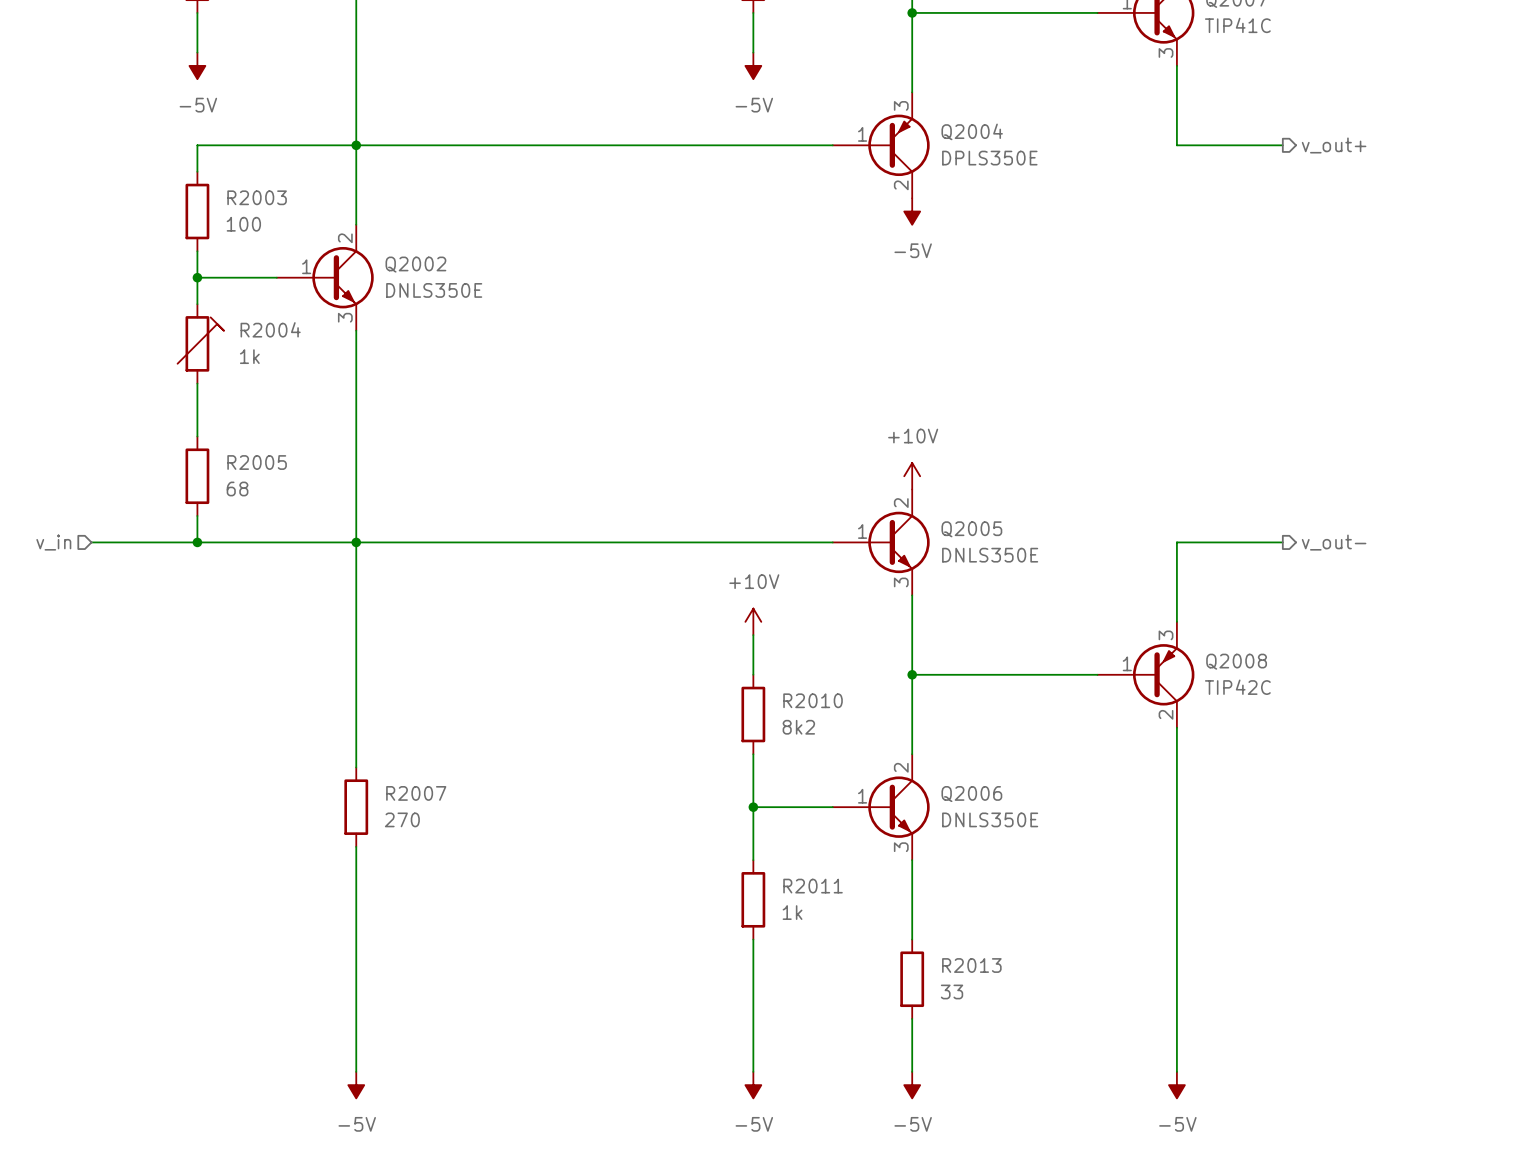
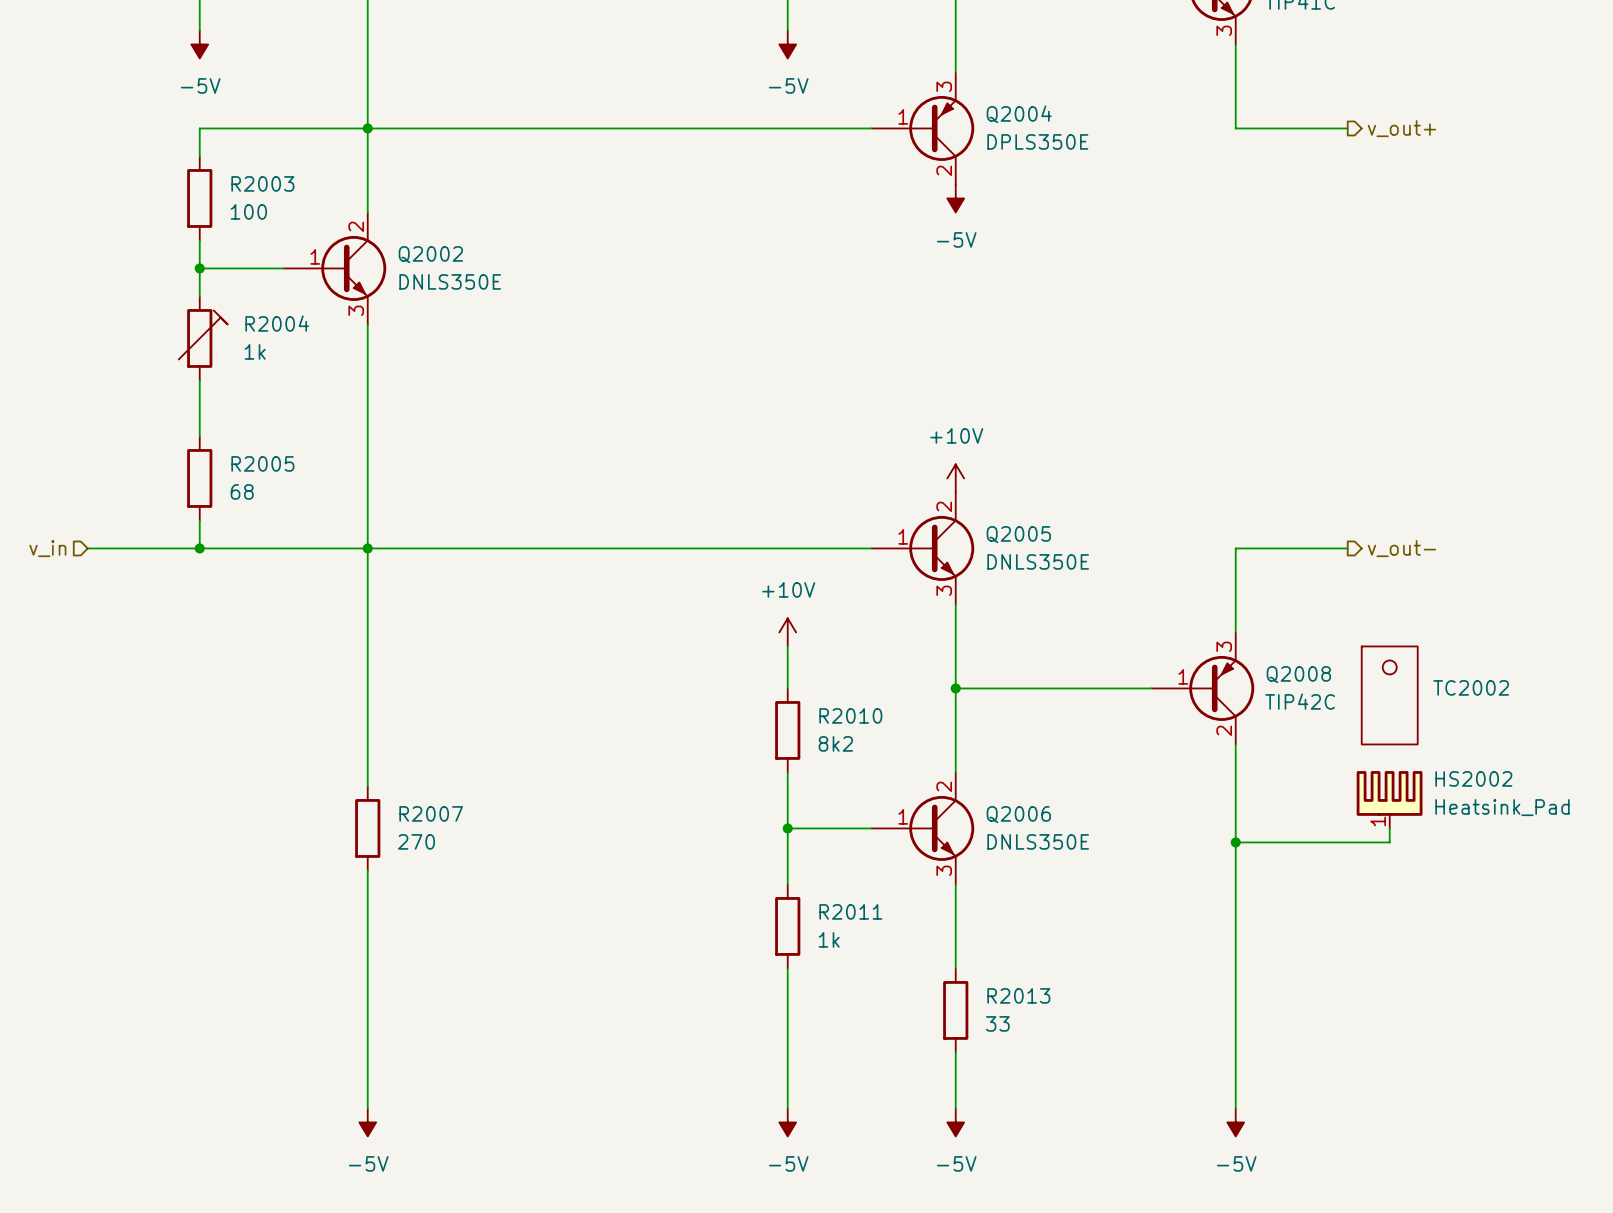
TC2002: none -> (1389, 695)
HS2002: none -> Heatsink_Pad (1389, 799)
wire: none -> (1389, 828) (1389, 842) (1235, 842)
junction: none -> (1235, 842)

